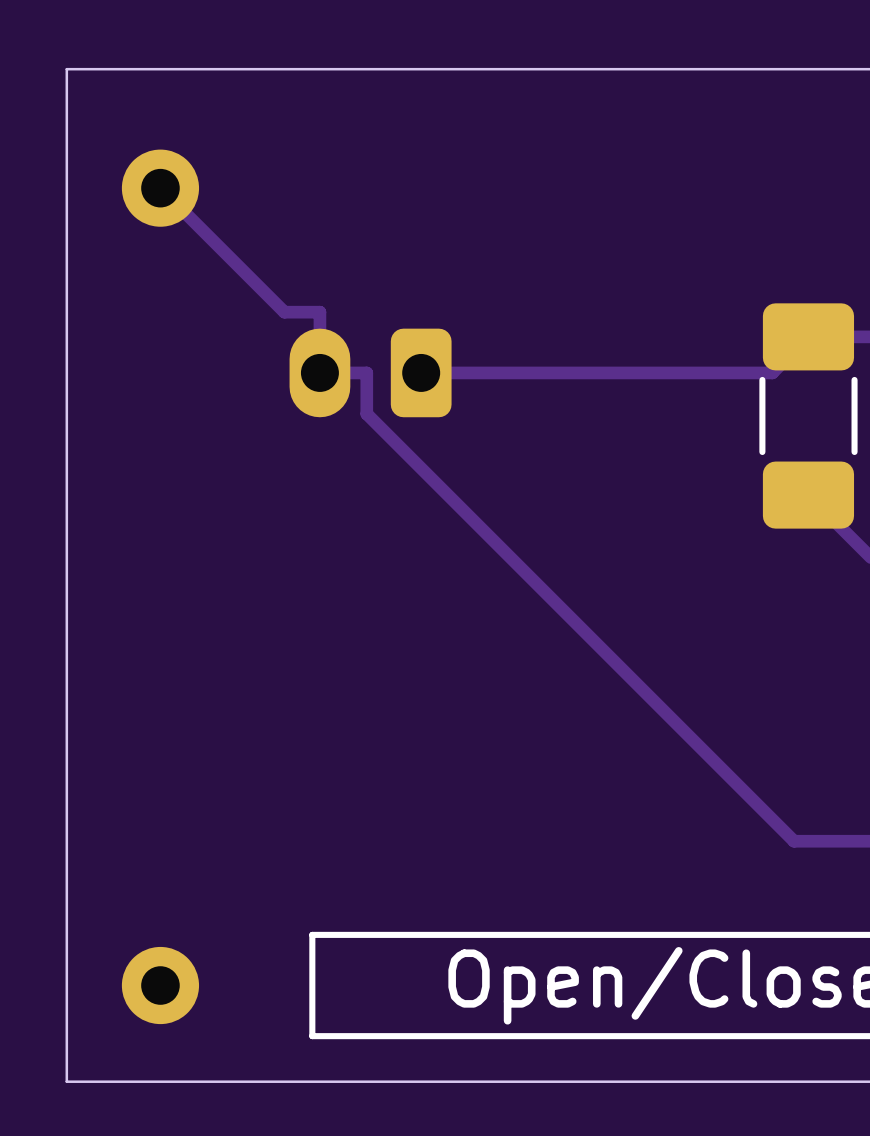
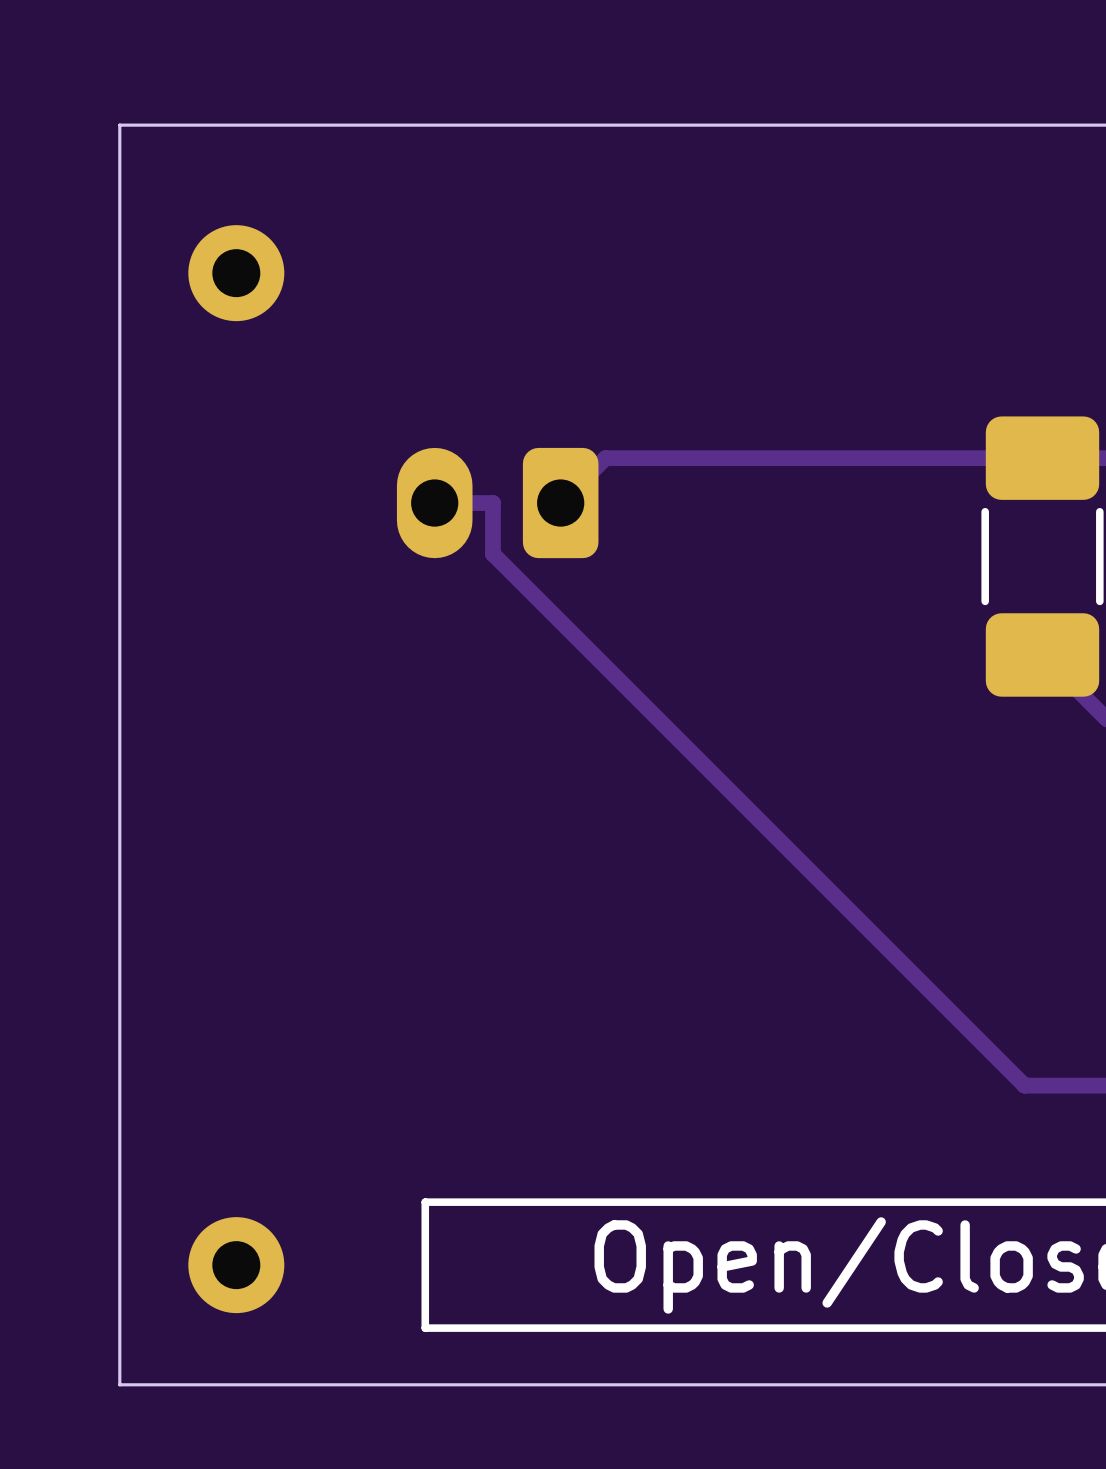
track: (160, 188) (284, 312) (319, 312) (319, 372) -> none
track: (808, 336) (772, 372) (421, 372) -> (1042, 458) (605, 458) (560, 503)

